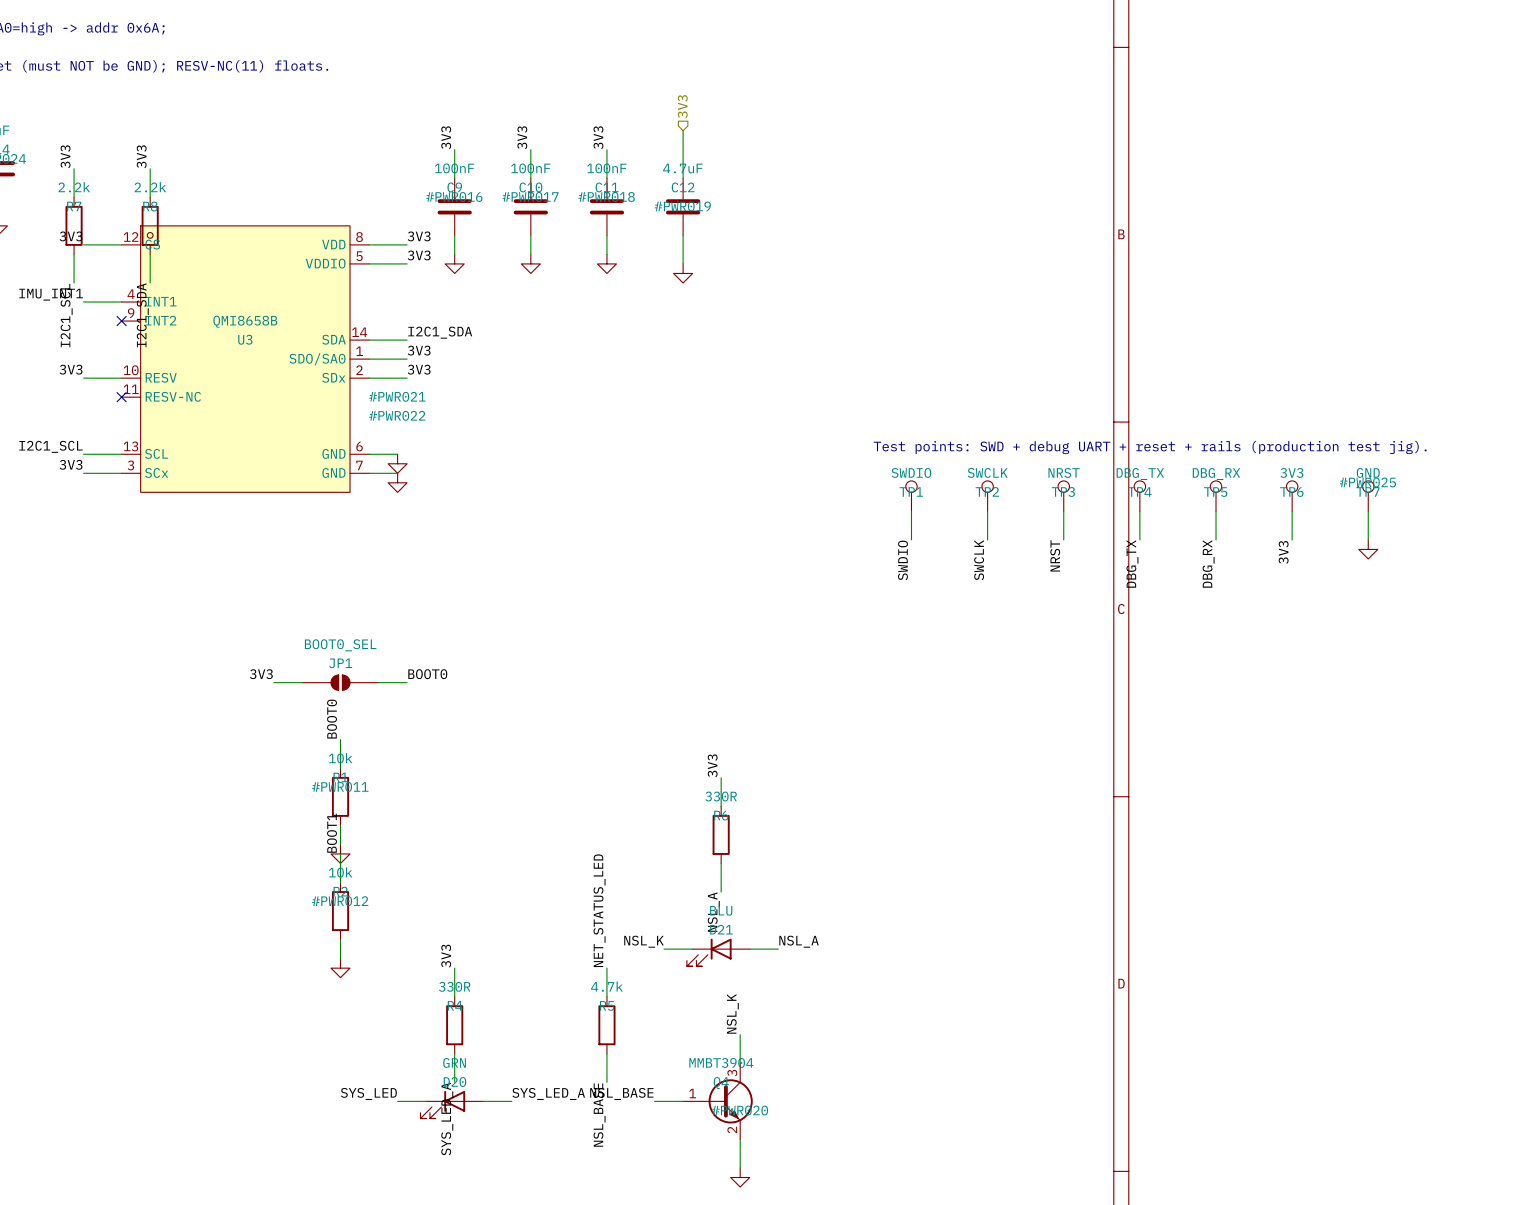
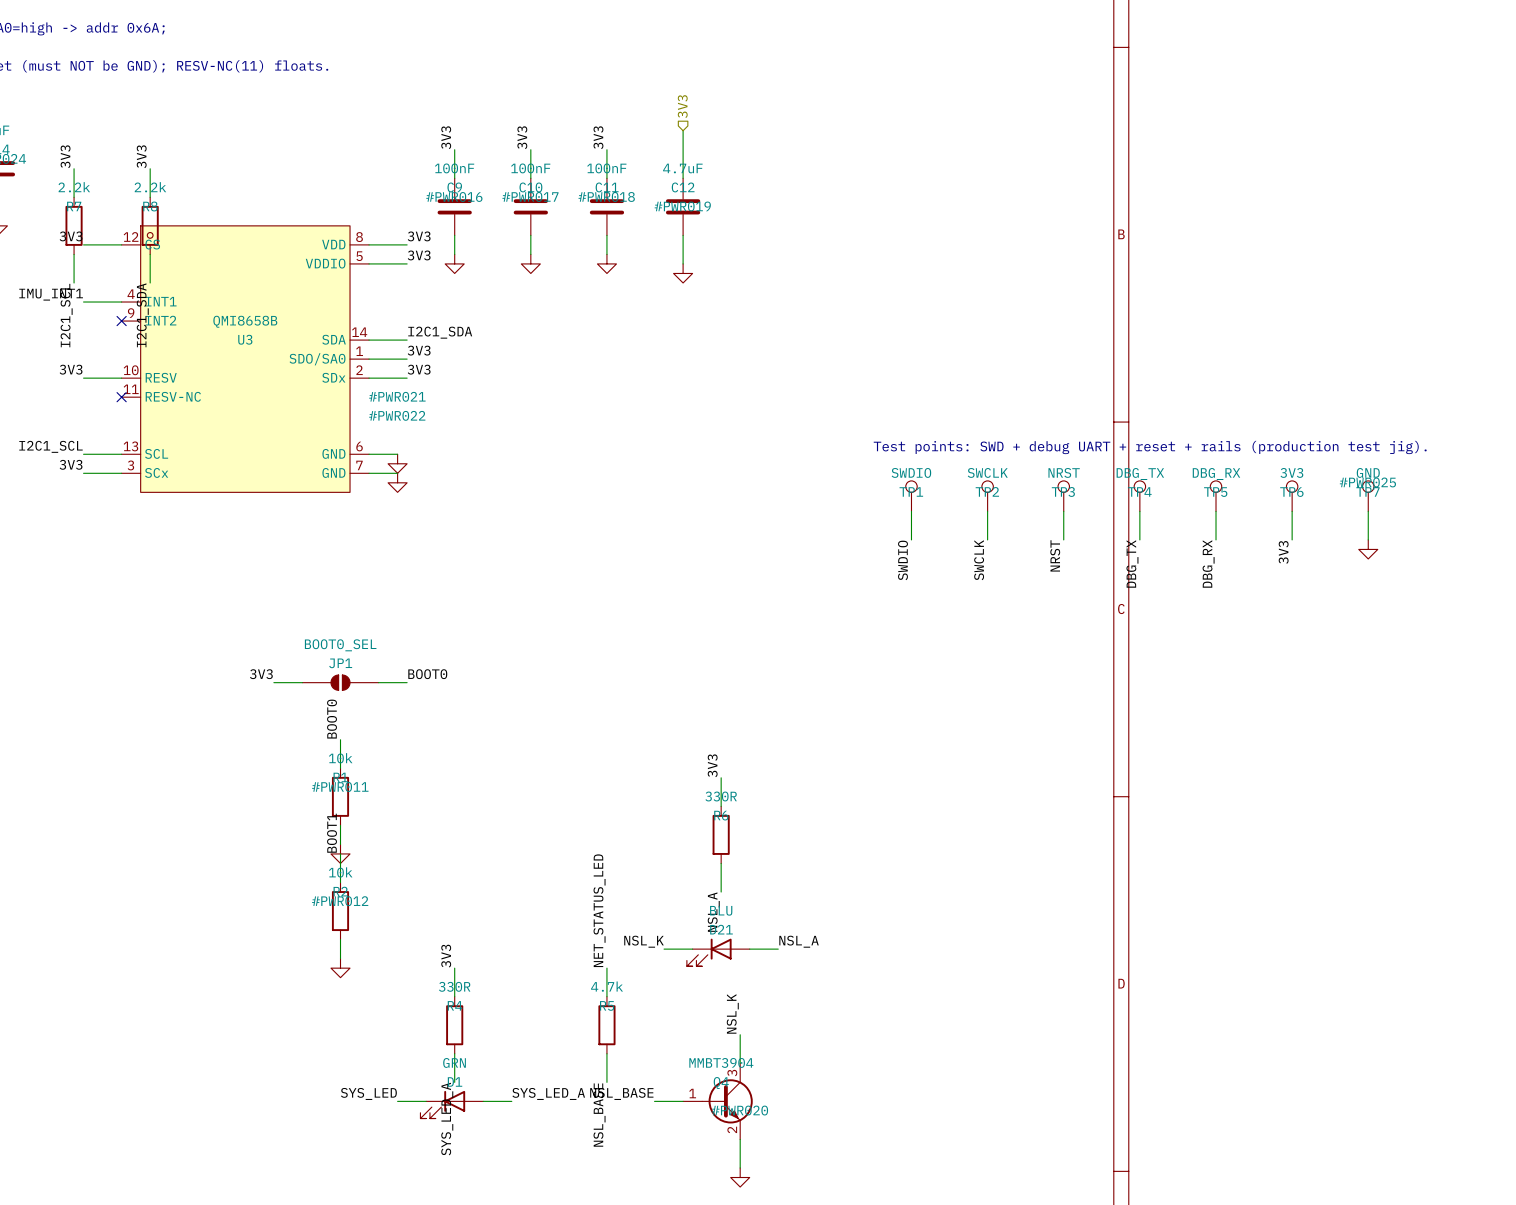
D20 name: D20 (454, 1081) -> D1 (455, 1081)

